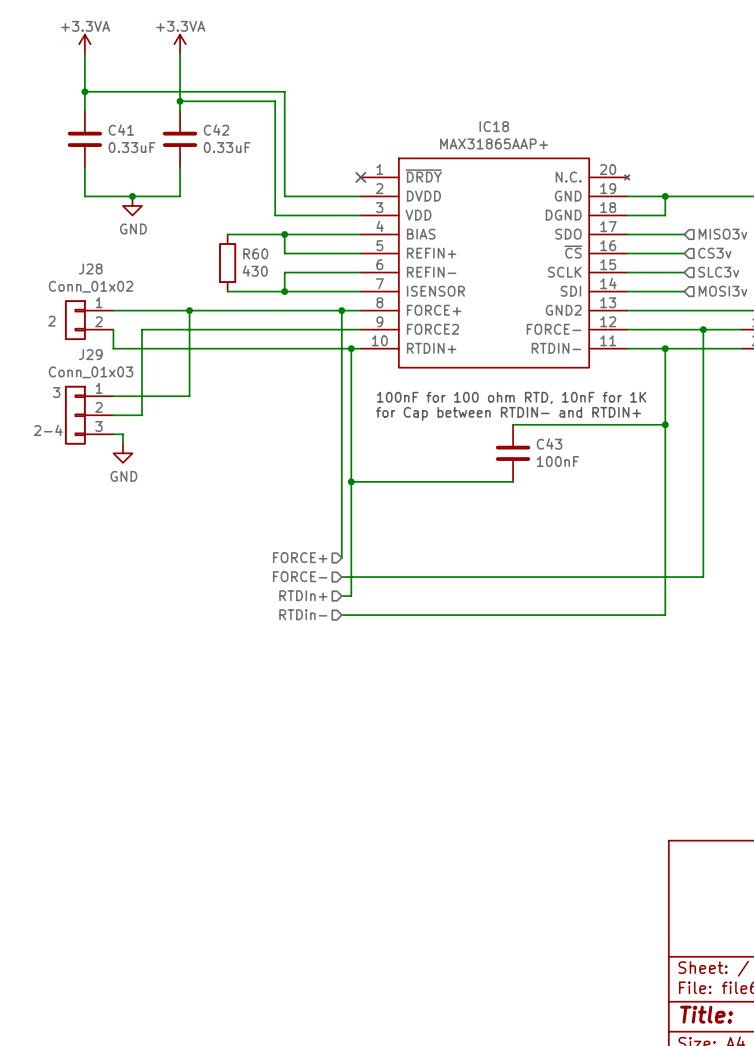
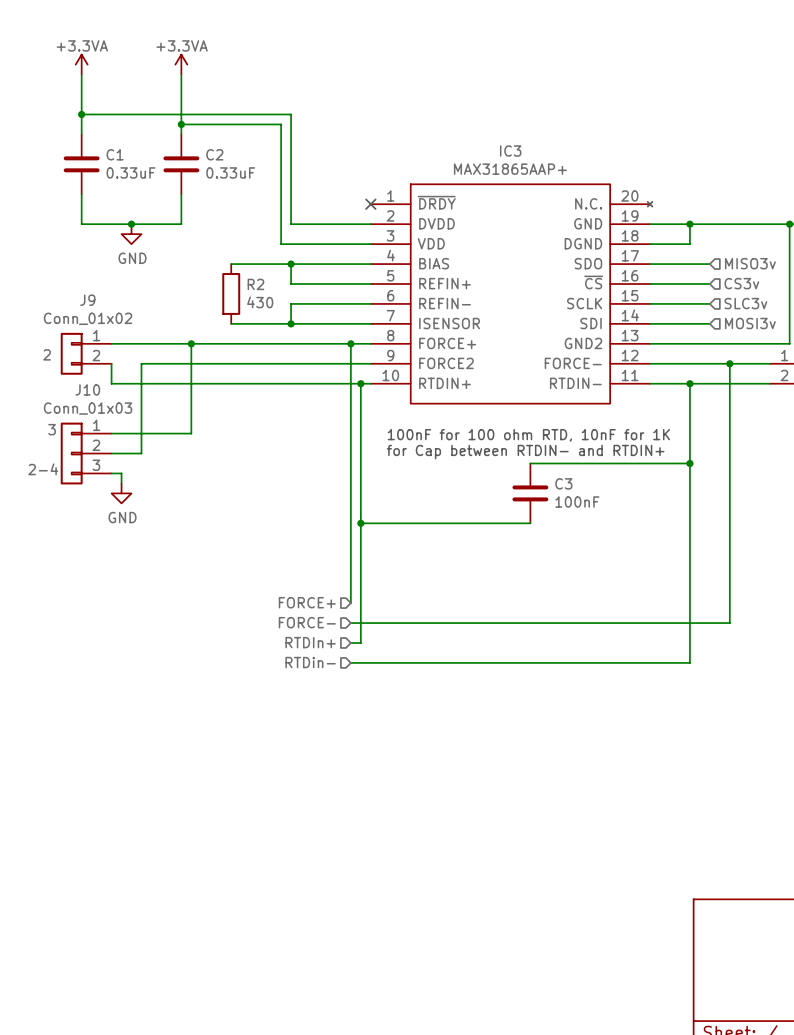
IC18 name: IC18 (494, 126) -> IC3 (510, 151)
C41 name: C41 (121, 130) -> C1 (115, 154)
C42 name: C42 (216, 130) -> C2 (214, 154)
R60 name: R60 (255, 253) -> R2 (255, 284)
J28 name: J28 (90, 268) -> J9 (87, 300)
J29 name: J29 (90, 354) -> J10 (87, 389)
C43 name: C43 (549, 443) -> C3 (563, 483)

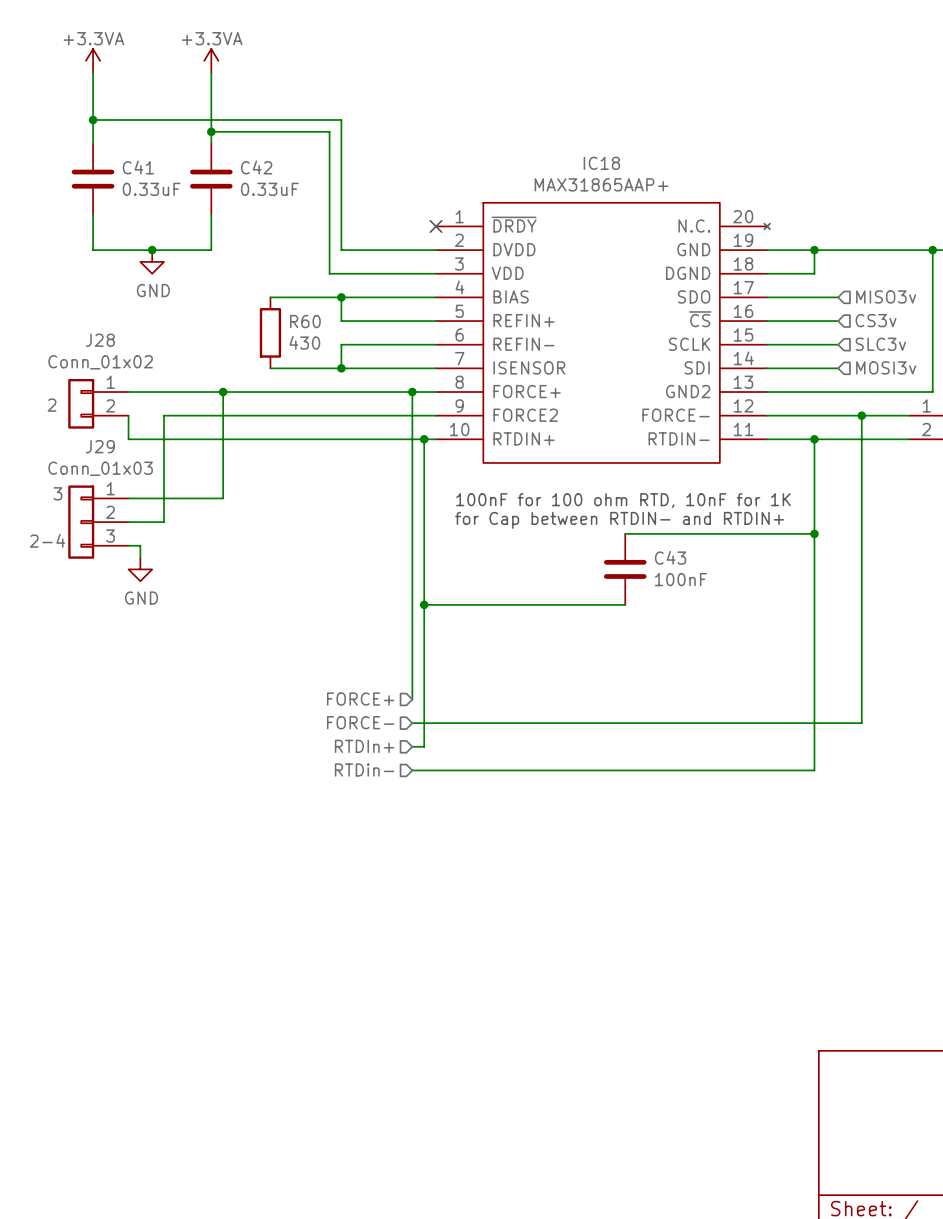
IC3 name: IC3 (510, 151) -> IC18 (601, 163)
C1 name: C1 (115, 154) -> C41 (138, 167)
C2 name: C2 (214, 154) -> C42 (256, 167)
R2 name: R2 (255, 284) -> R60 (305, 321)
J9 name: J9 (87, 300) -> J28 (100, 340)
J10 name: J10 (87, 389) -> J29 (100, 446)
C3 name: C3 (563, 483) -> C43 (670, 557)

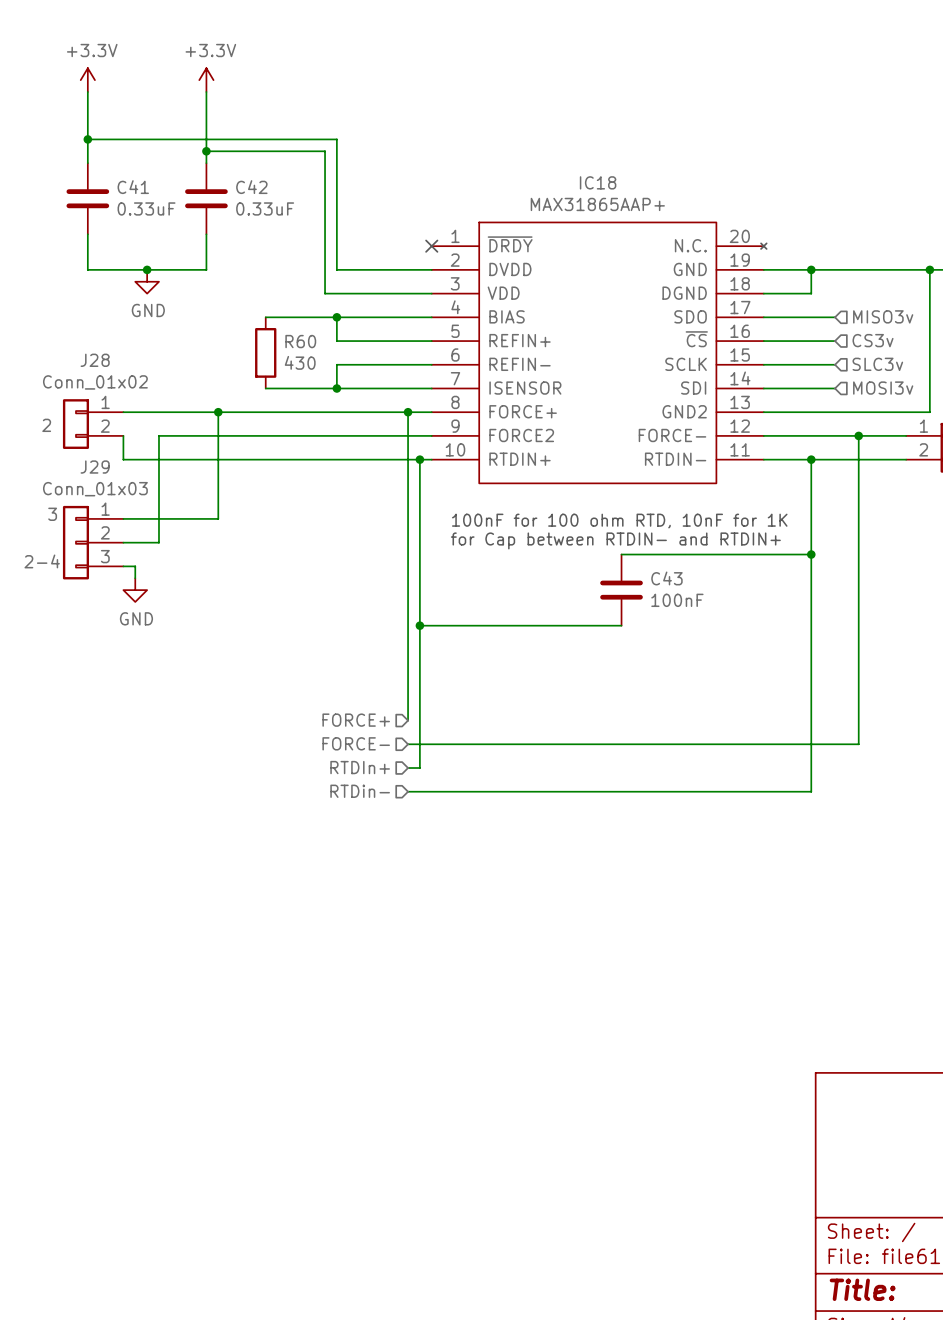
power symbol: +3.3VA (93, 60) -> +3.3V (87, 80)
power symbol: +3.3VA (211, 60) -> +3.3V (206, 80)

